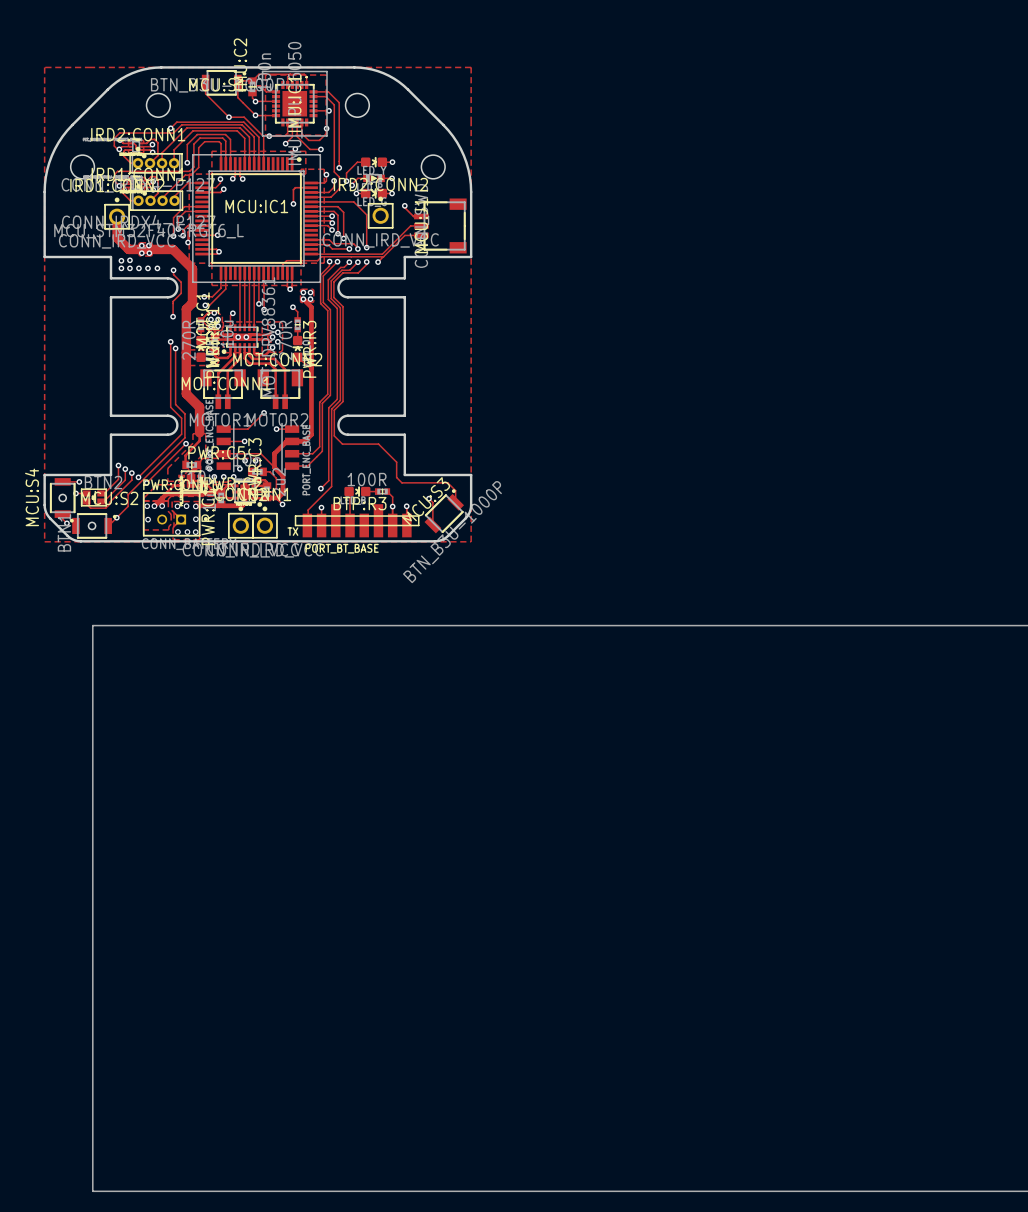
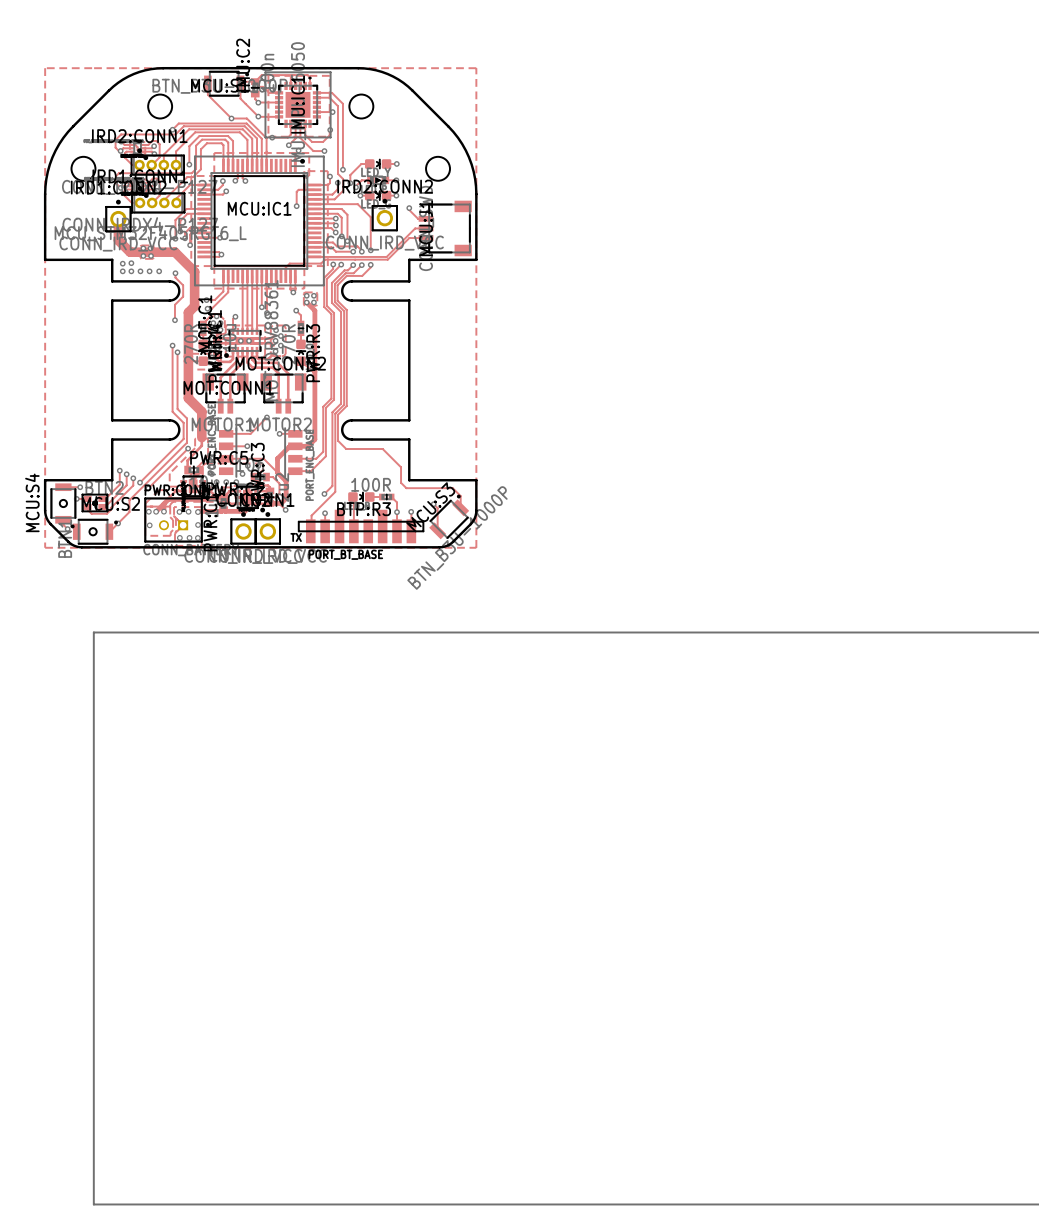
track: (383, 256) (378, 262) -> none
via: (378, 262) -> none

